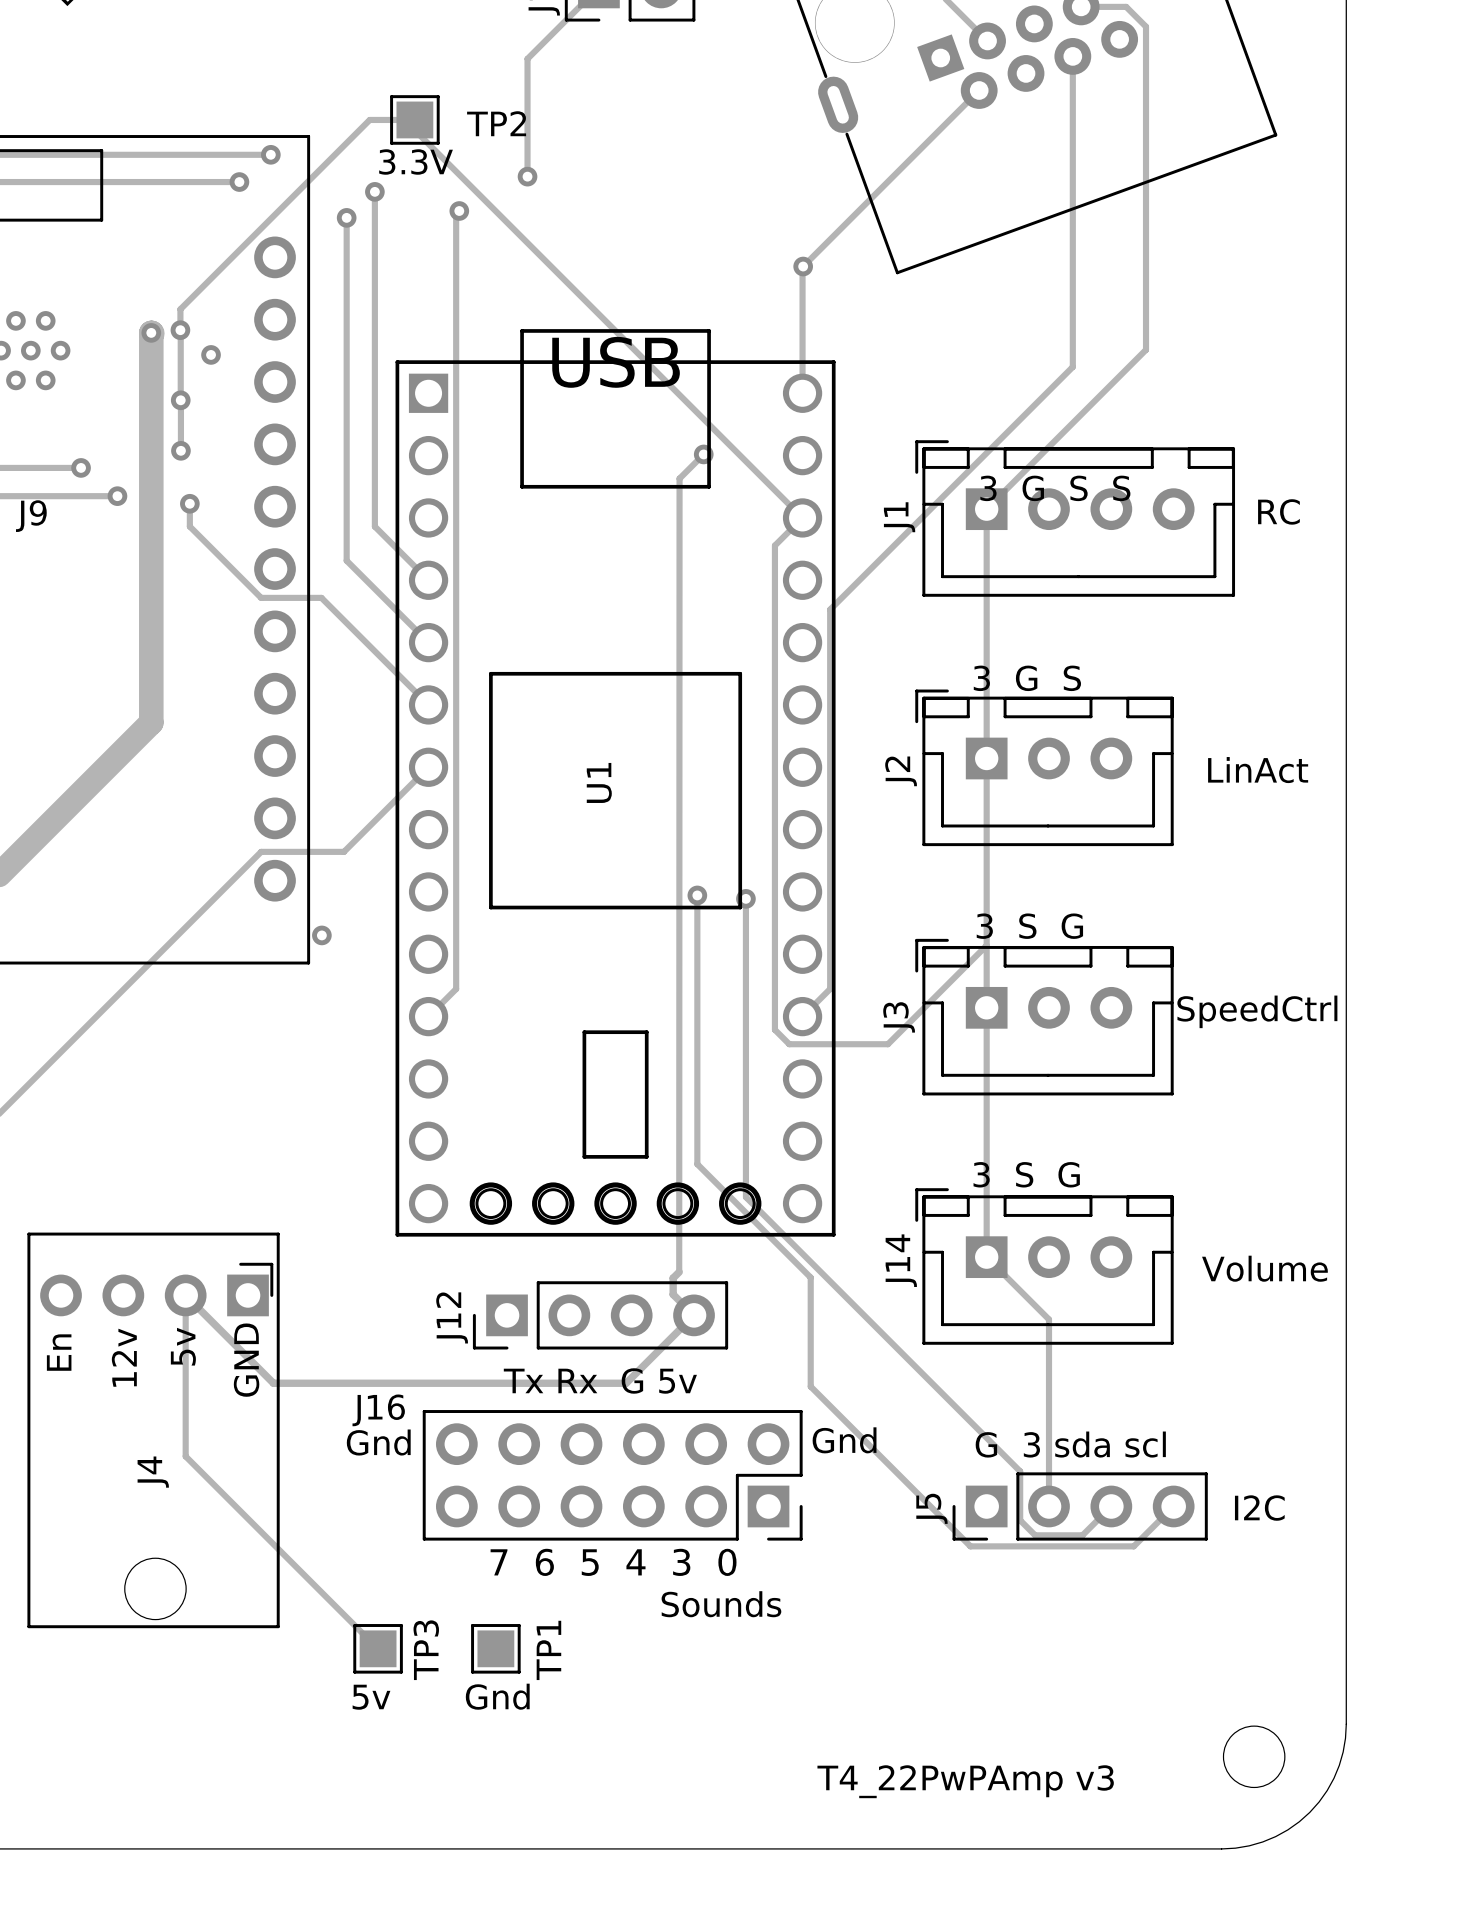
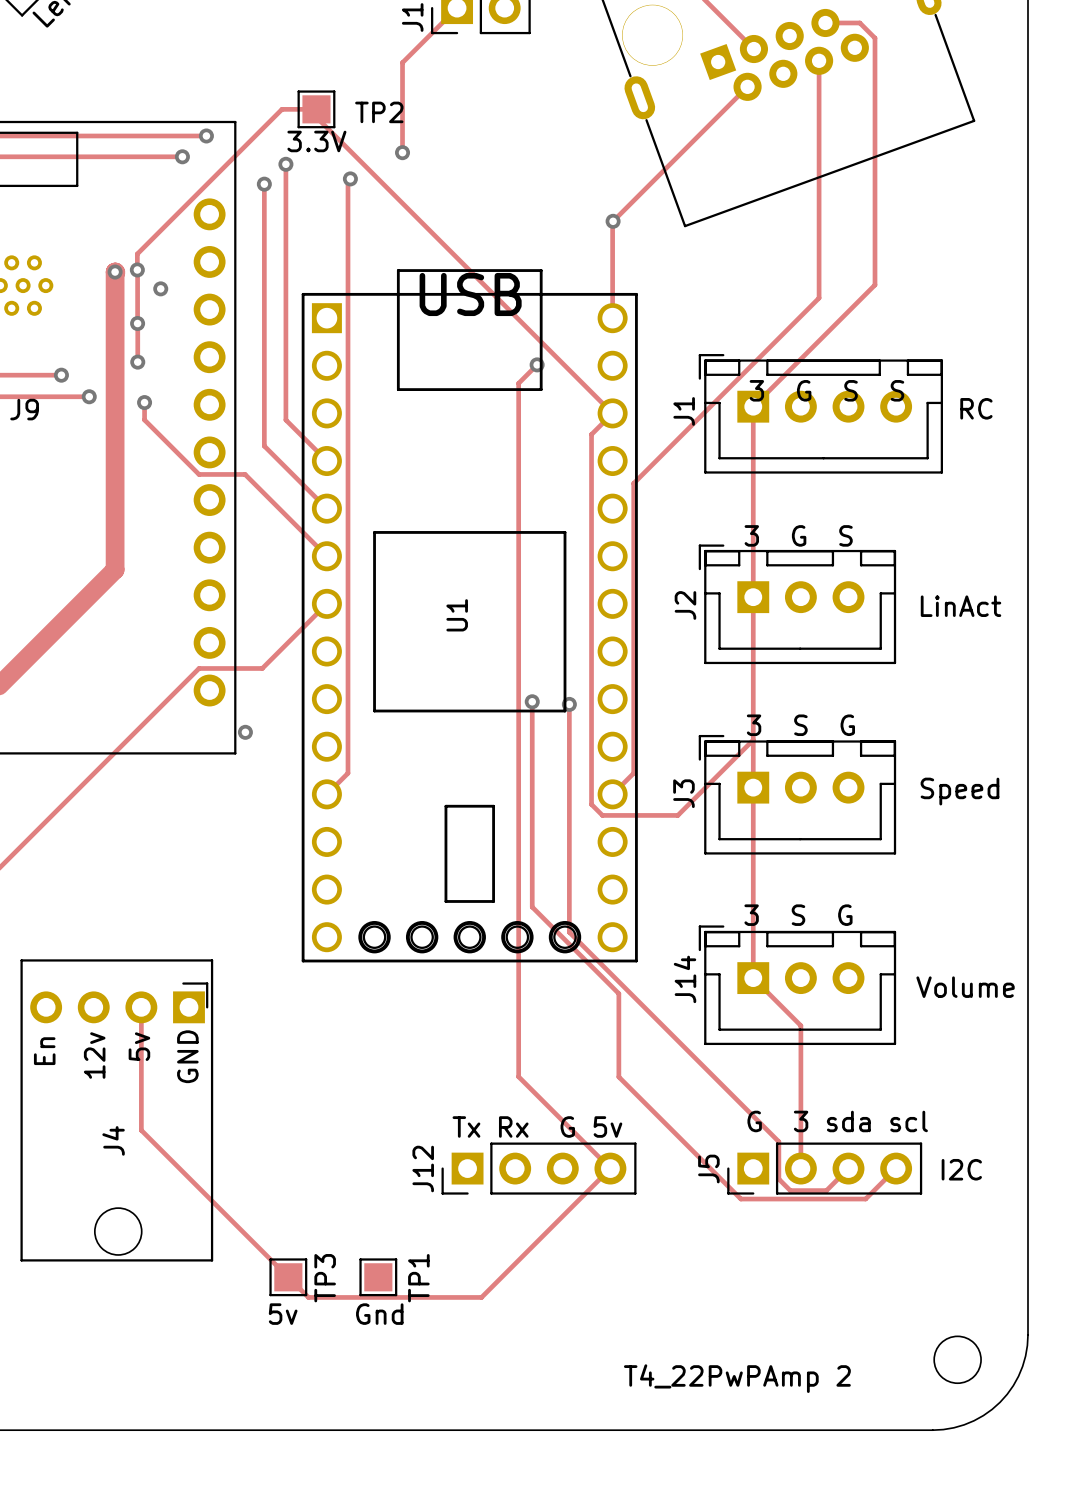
track: (679, 478) (679, 1272) (673, 1278) (673, 1294) (694, 1315) (626, 1383) (273, 1383) (185, 1295) -> (518, 383) (518, 1076) (610, 1168) (481, 1297) (308, 1297) (288, 1277)
J3 value: SpeedCtrl (1257, 1011) -> Speed (959, 791)
J12 position: (600, 1315) -> (539, 1168)
text position: Tx Rx G 5v (600, 1380) -> Tx Rx G 5v (537, 1127)
text: Gnd (844, 1440) -> none
text: Gnd (378, 1442) -> none
J16: (612, 1475) -> none
text: 7 6 5 4 3 0 (613, 1562) -> none
text: Sounds (721, 1604) -> none
text: T4_22PwPAmp v3 (965, 1781) -> T4_22PwPAmp 2 (737, 1378)

